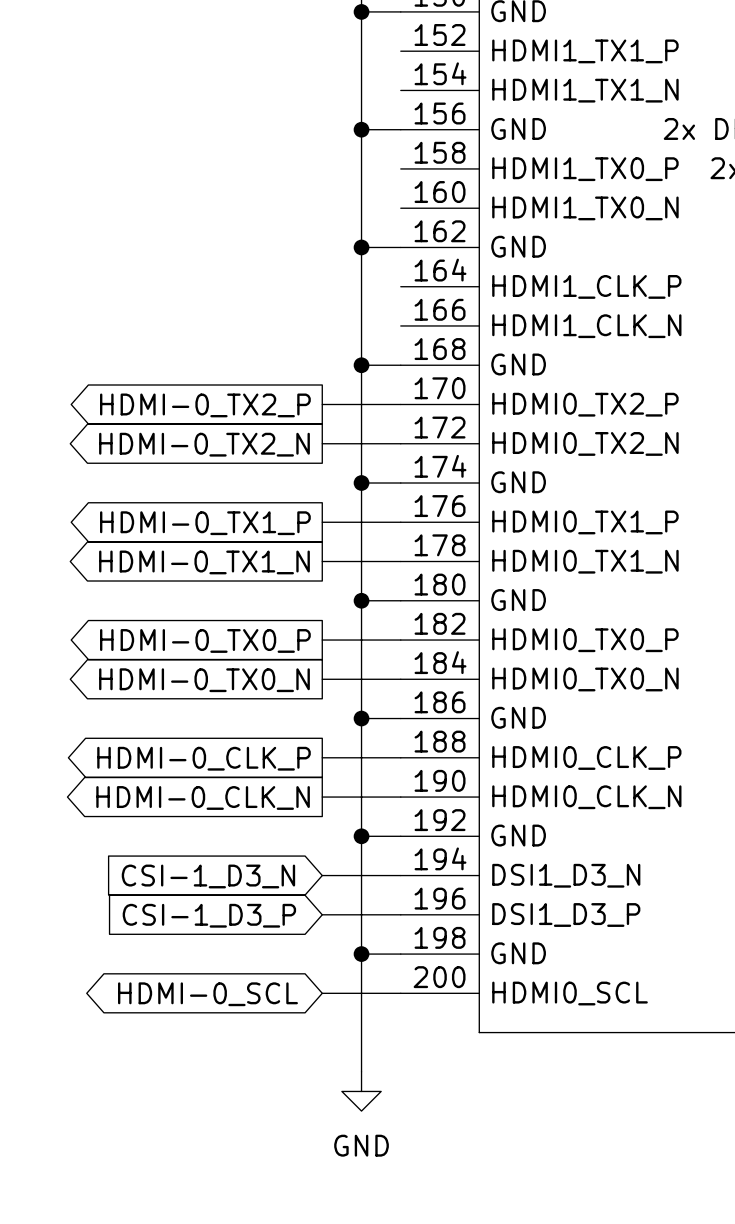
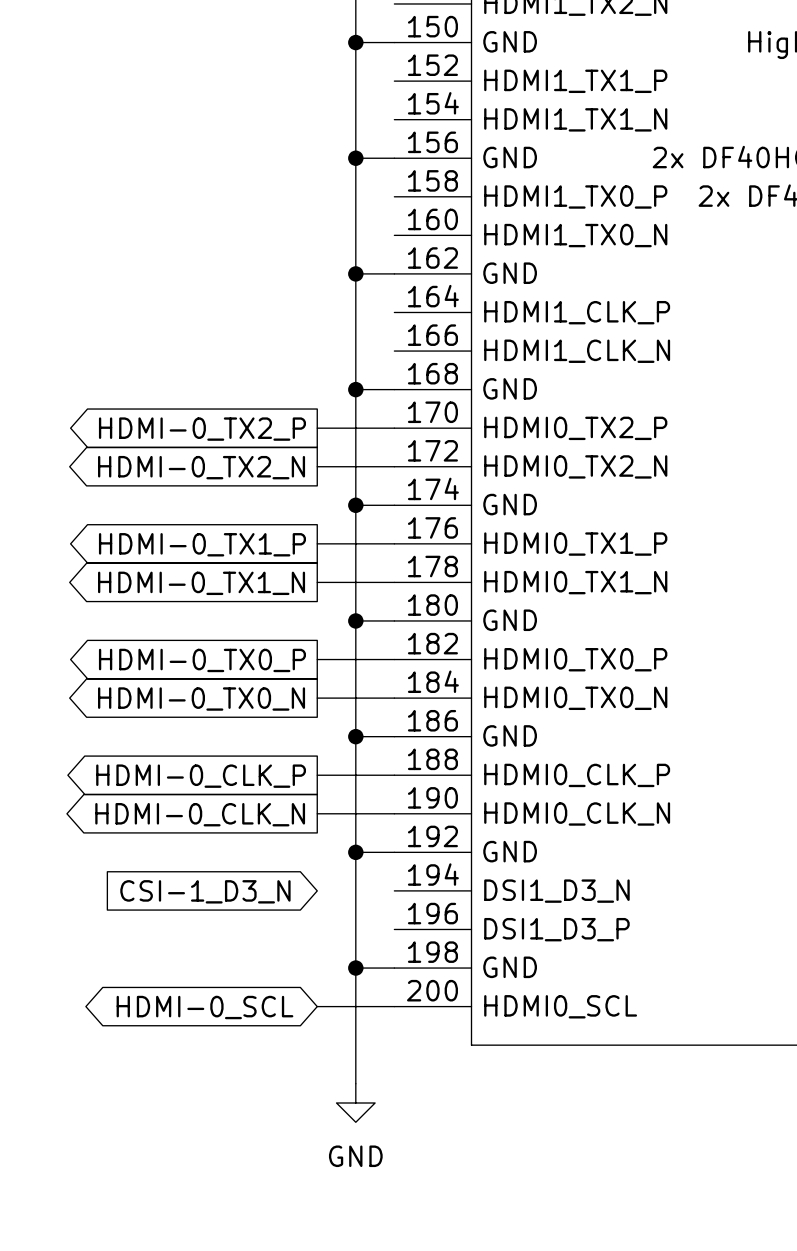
wire: (322, 875) (400, 875) -> none
wire: (322, 914) (400, 914) -> none
global label: CSI-1_D3_P (209, 915) -> none

